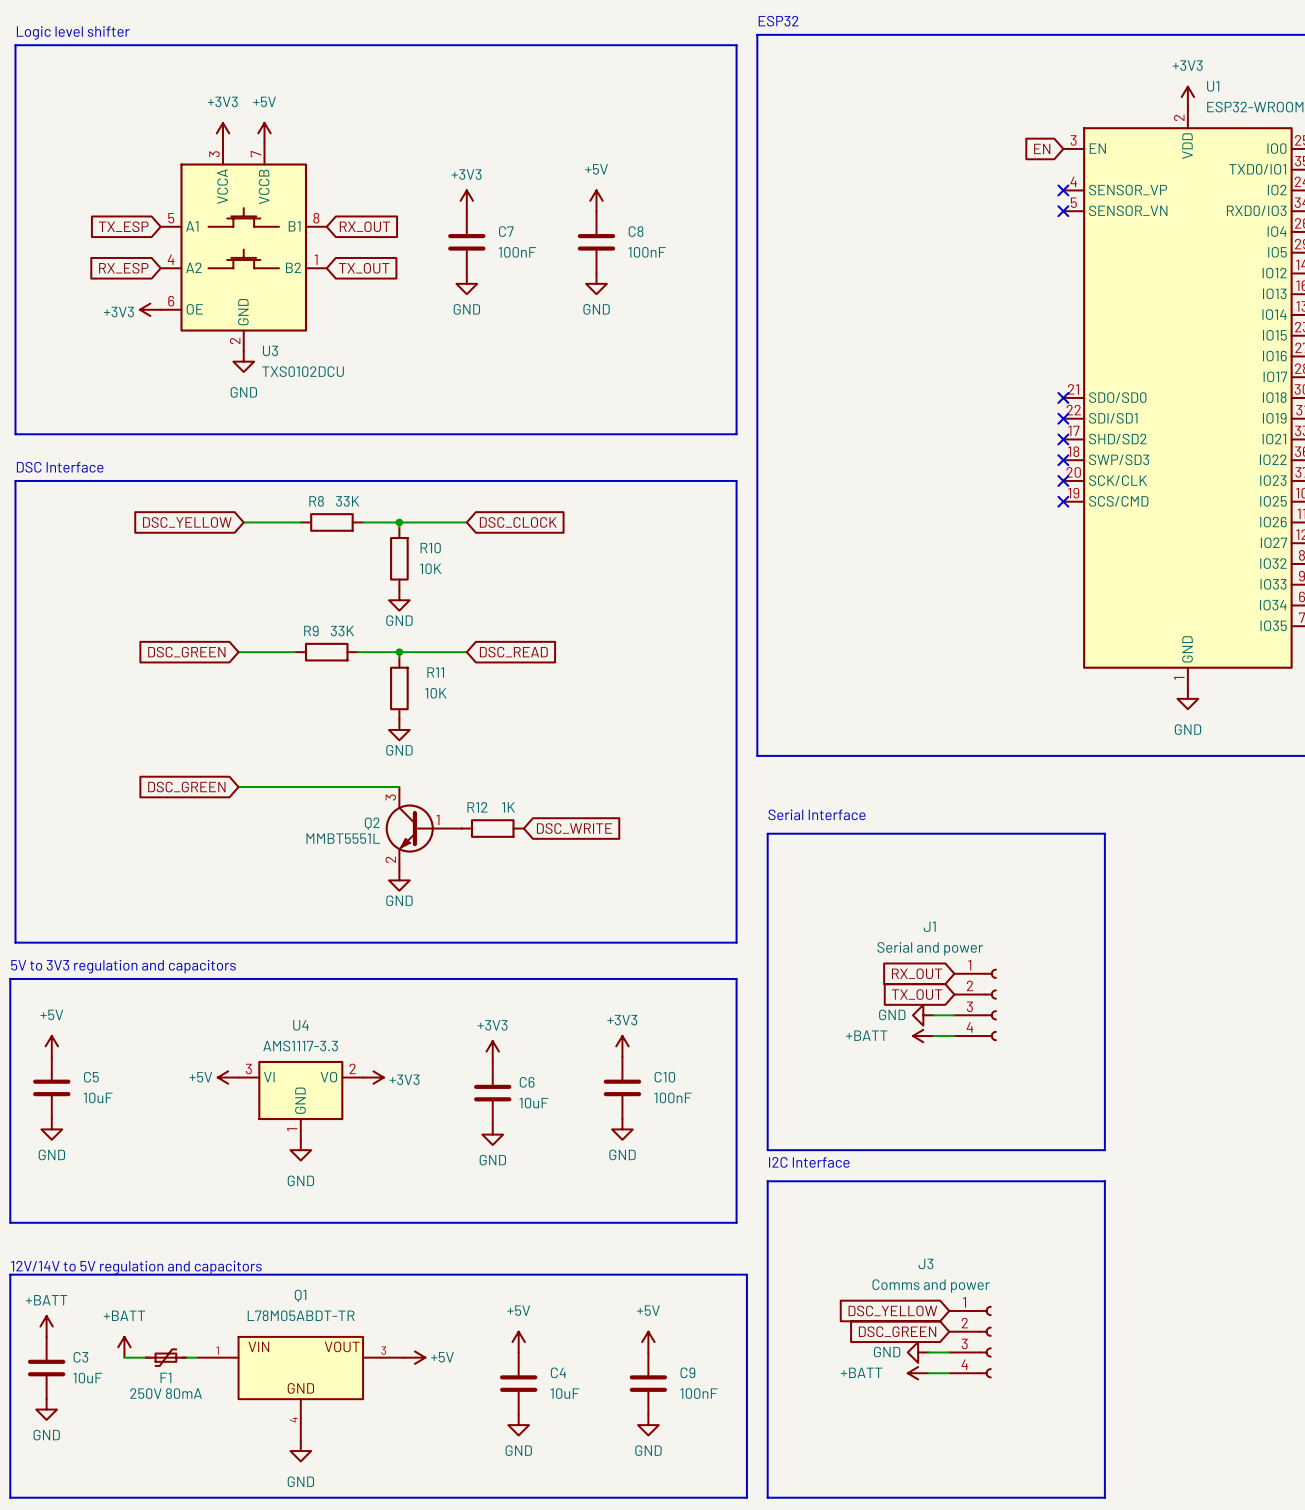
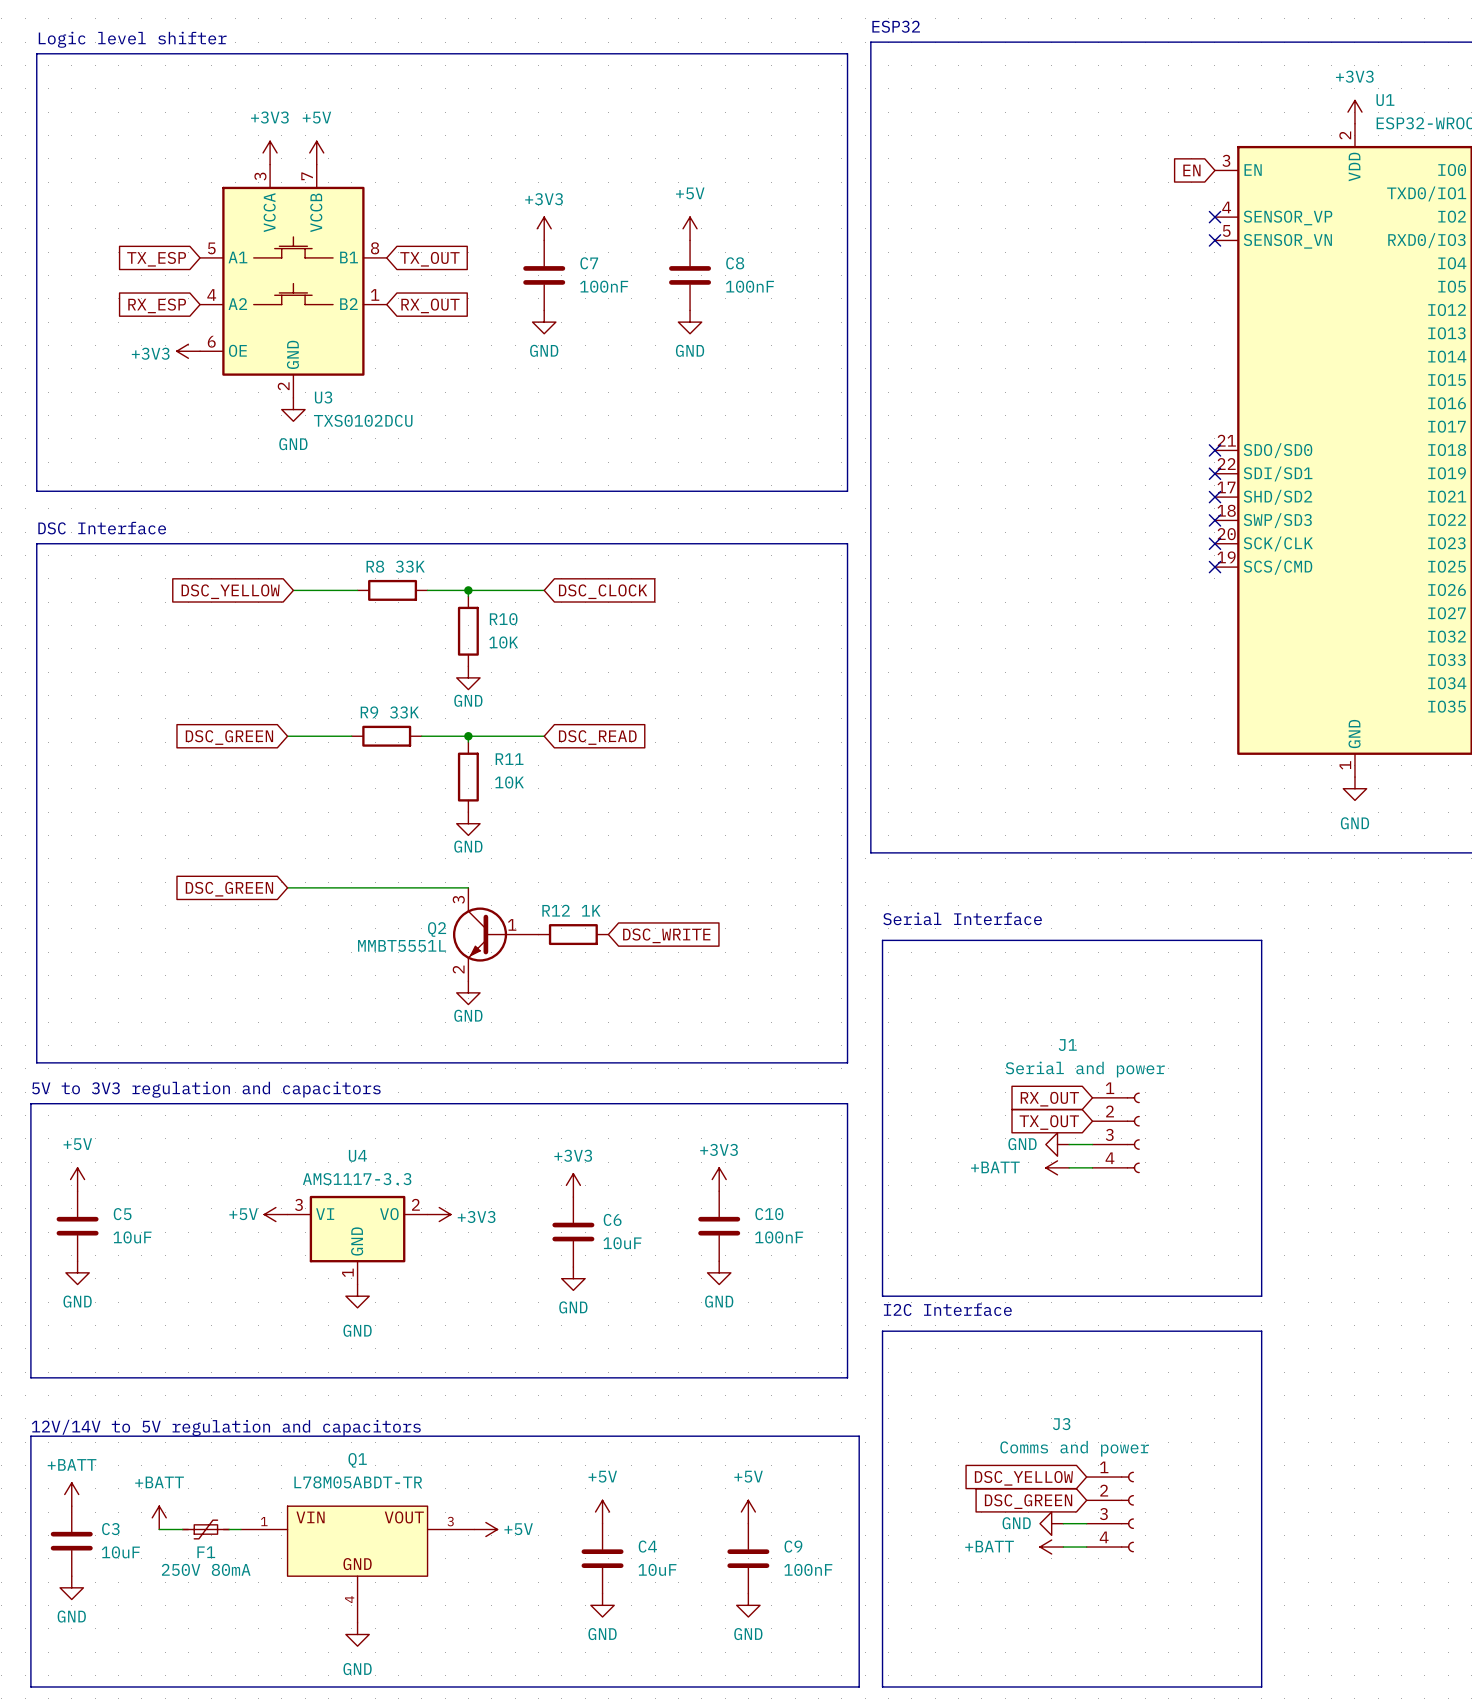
global label: RX_OUT (364, 226) -> TX_OUT (429, 259)
global label: TX_OUT (364, 268) -> RX_OUT (430, 305)

